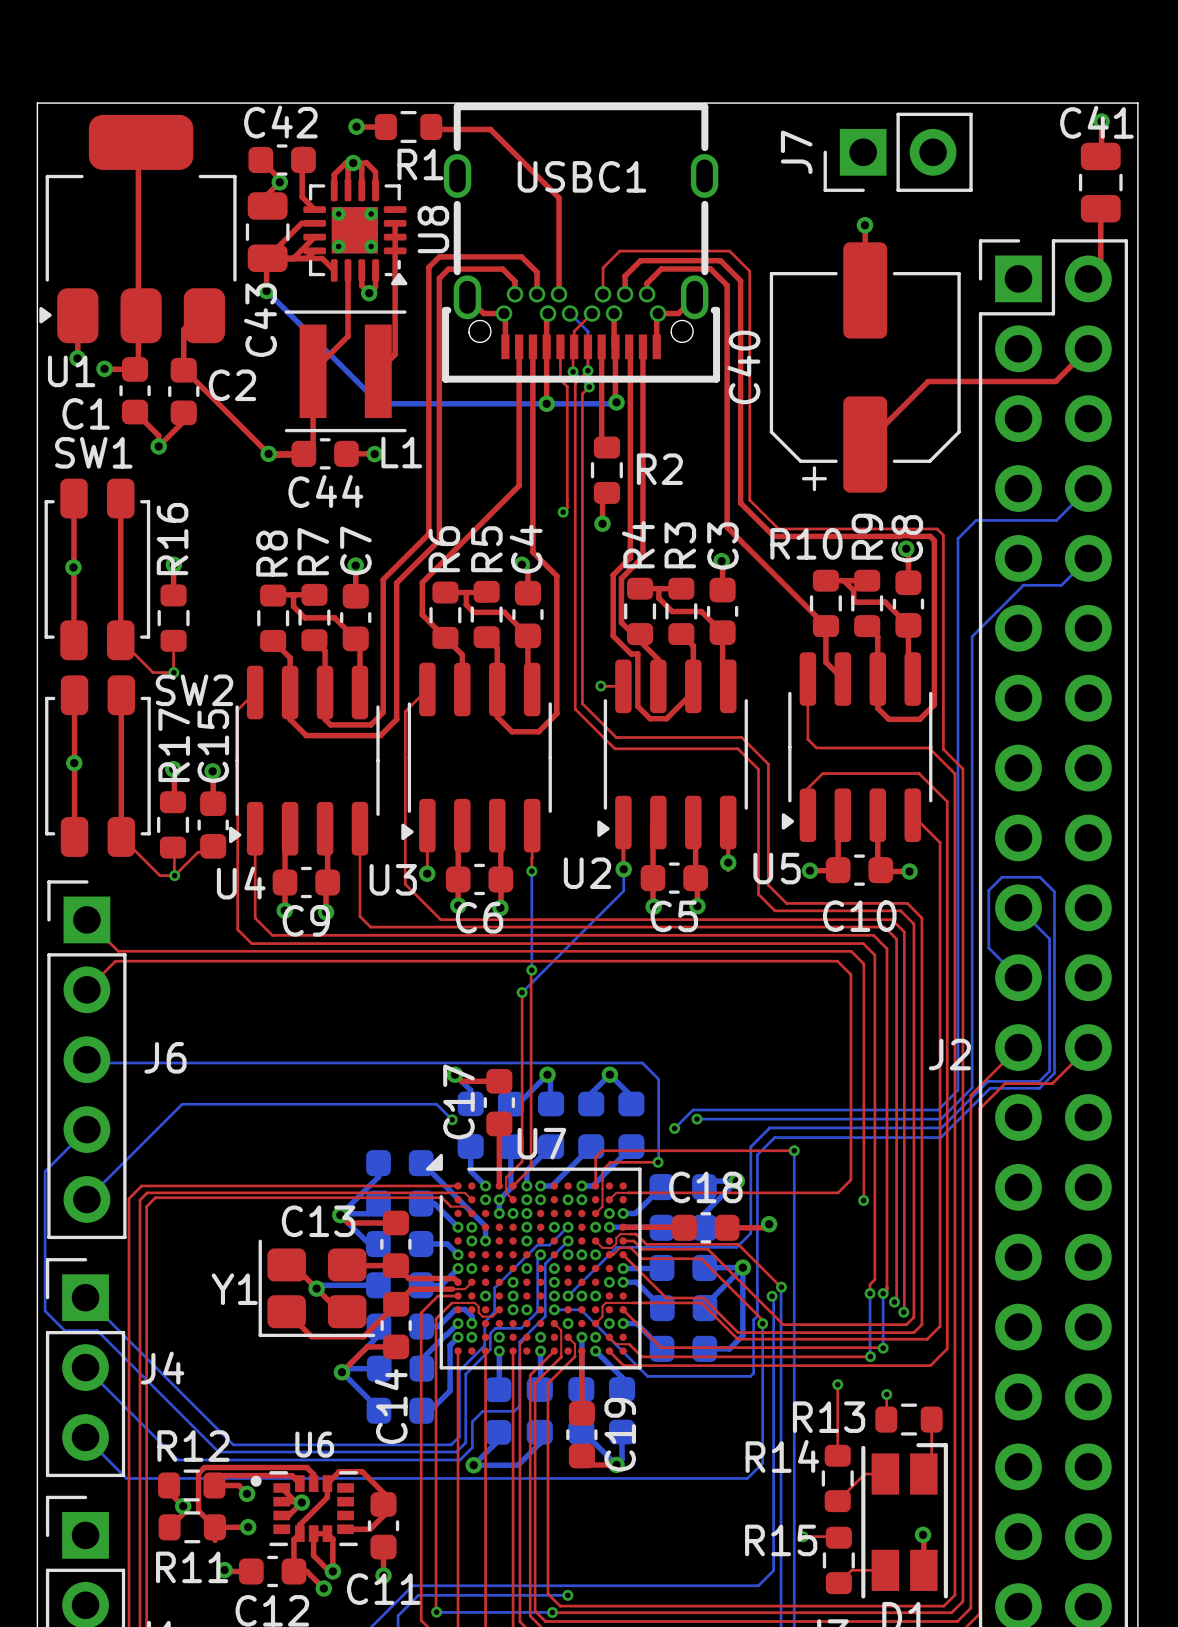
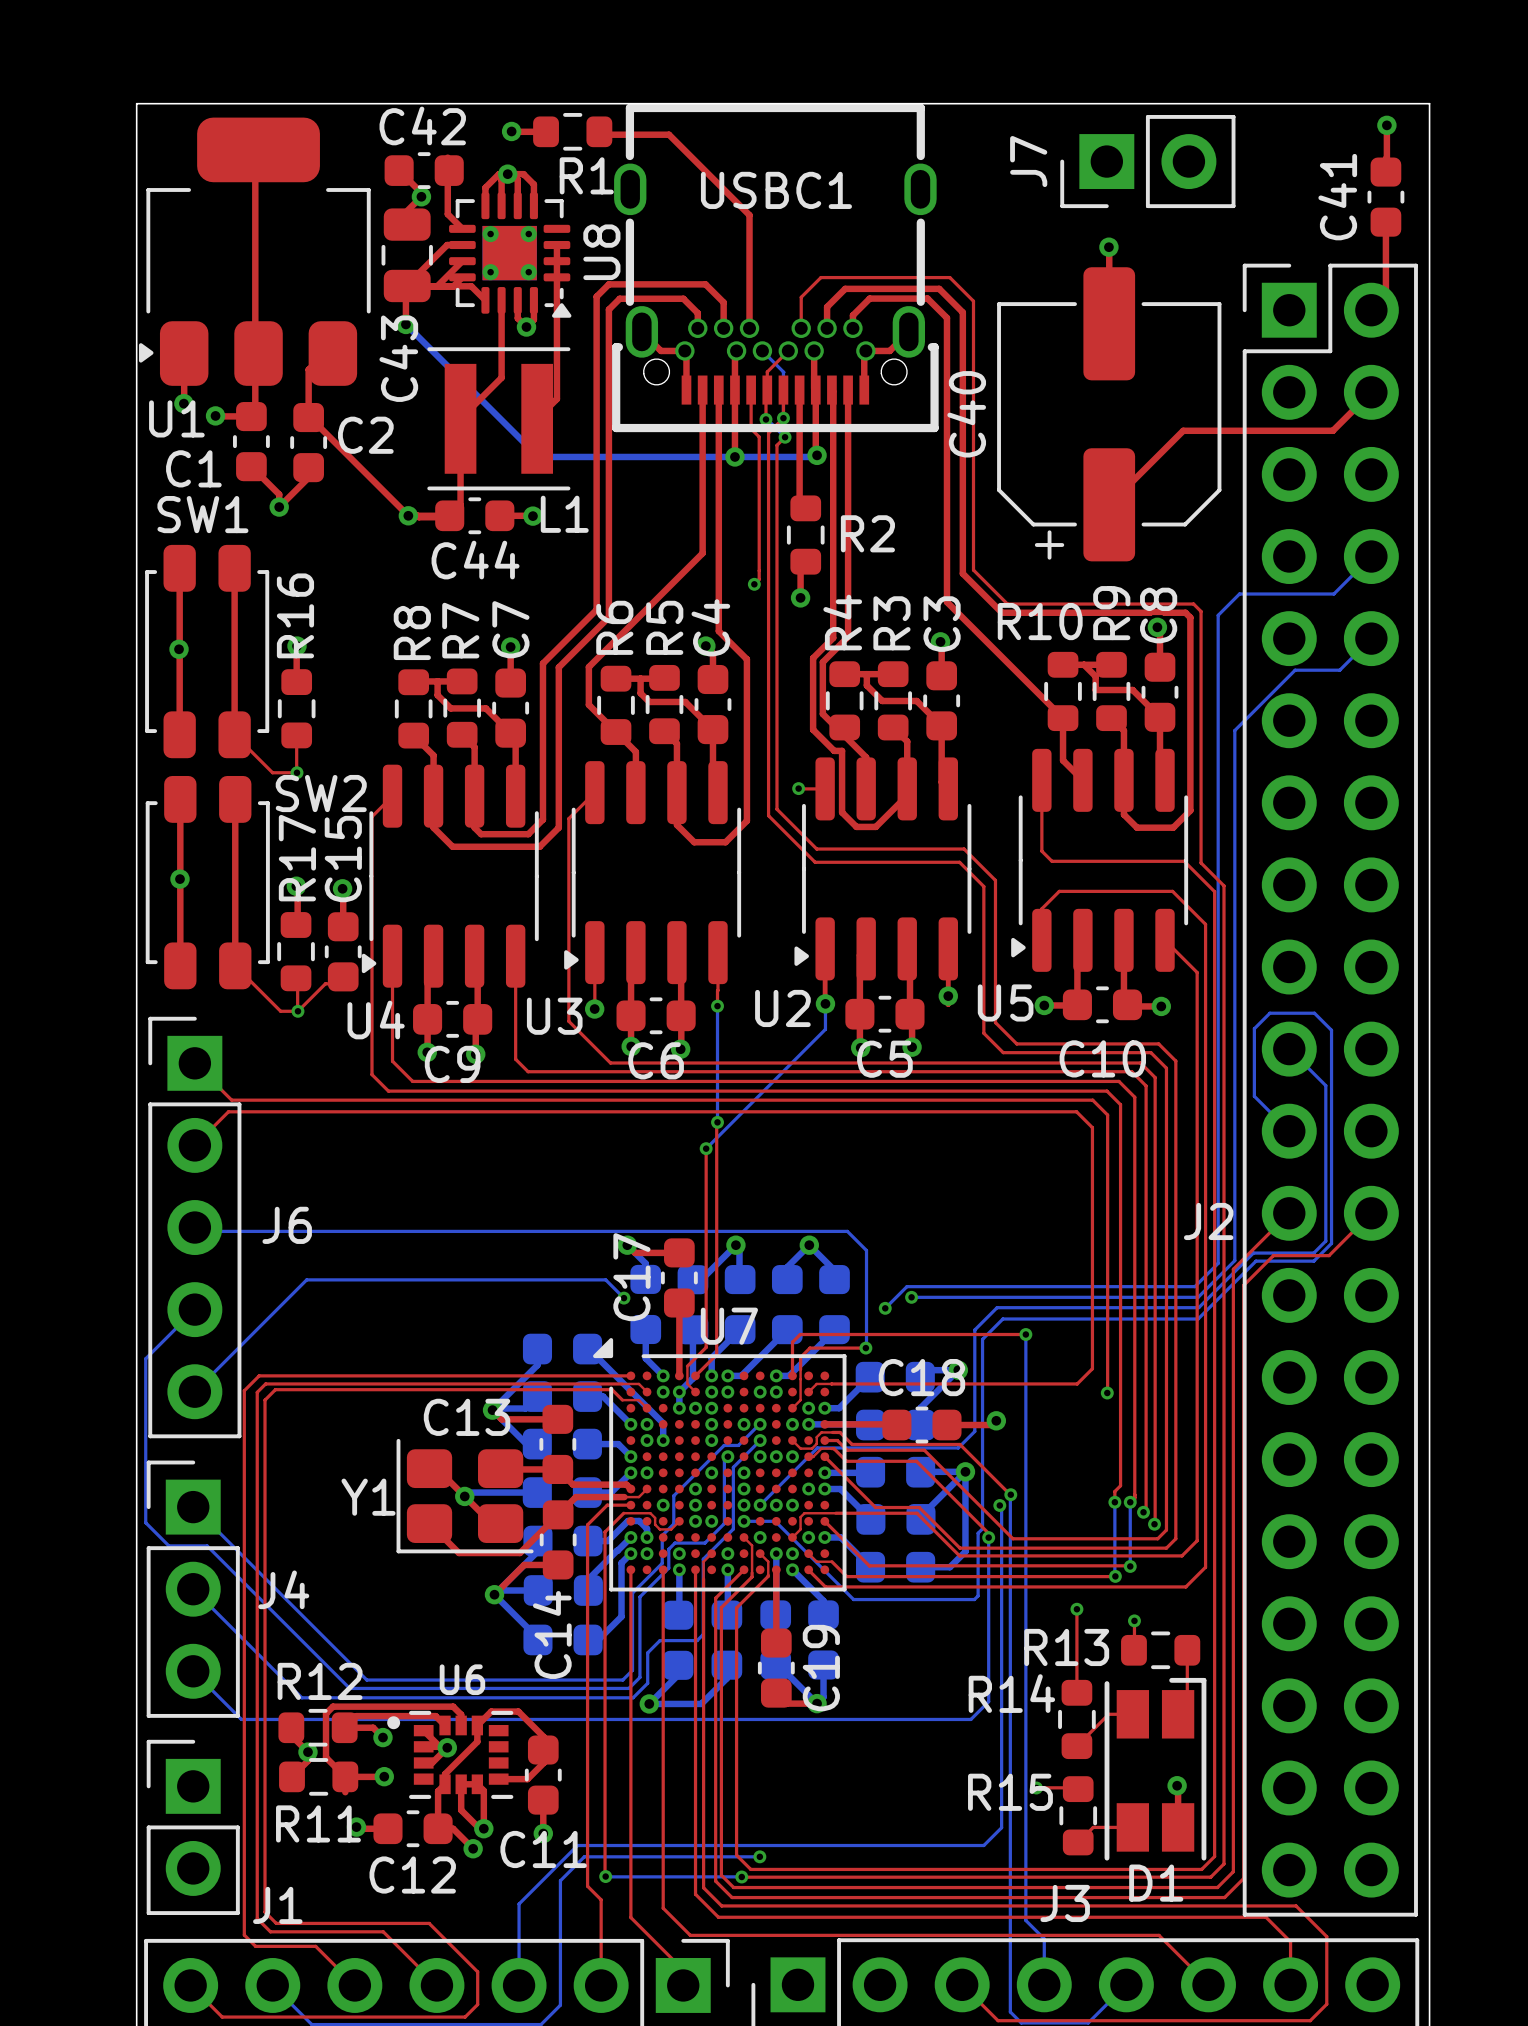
C41 name rotation: 0° (1096, 122) -> 90° counterclockwise (1337, 197)
C41 footprint: [1078, 142, 1123, 223] -> [1367, 157, 1405, 237]

